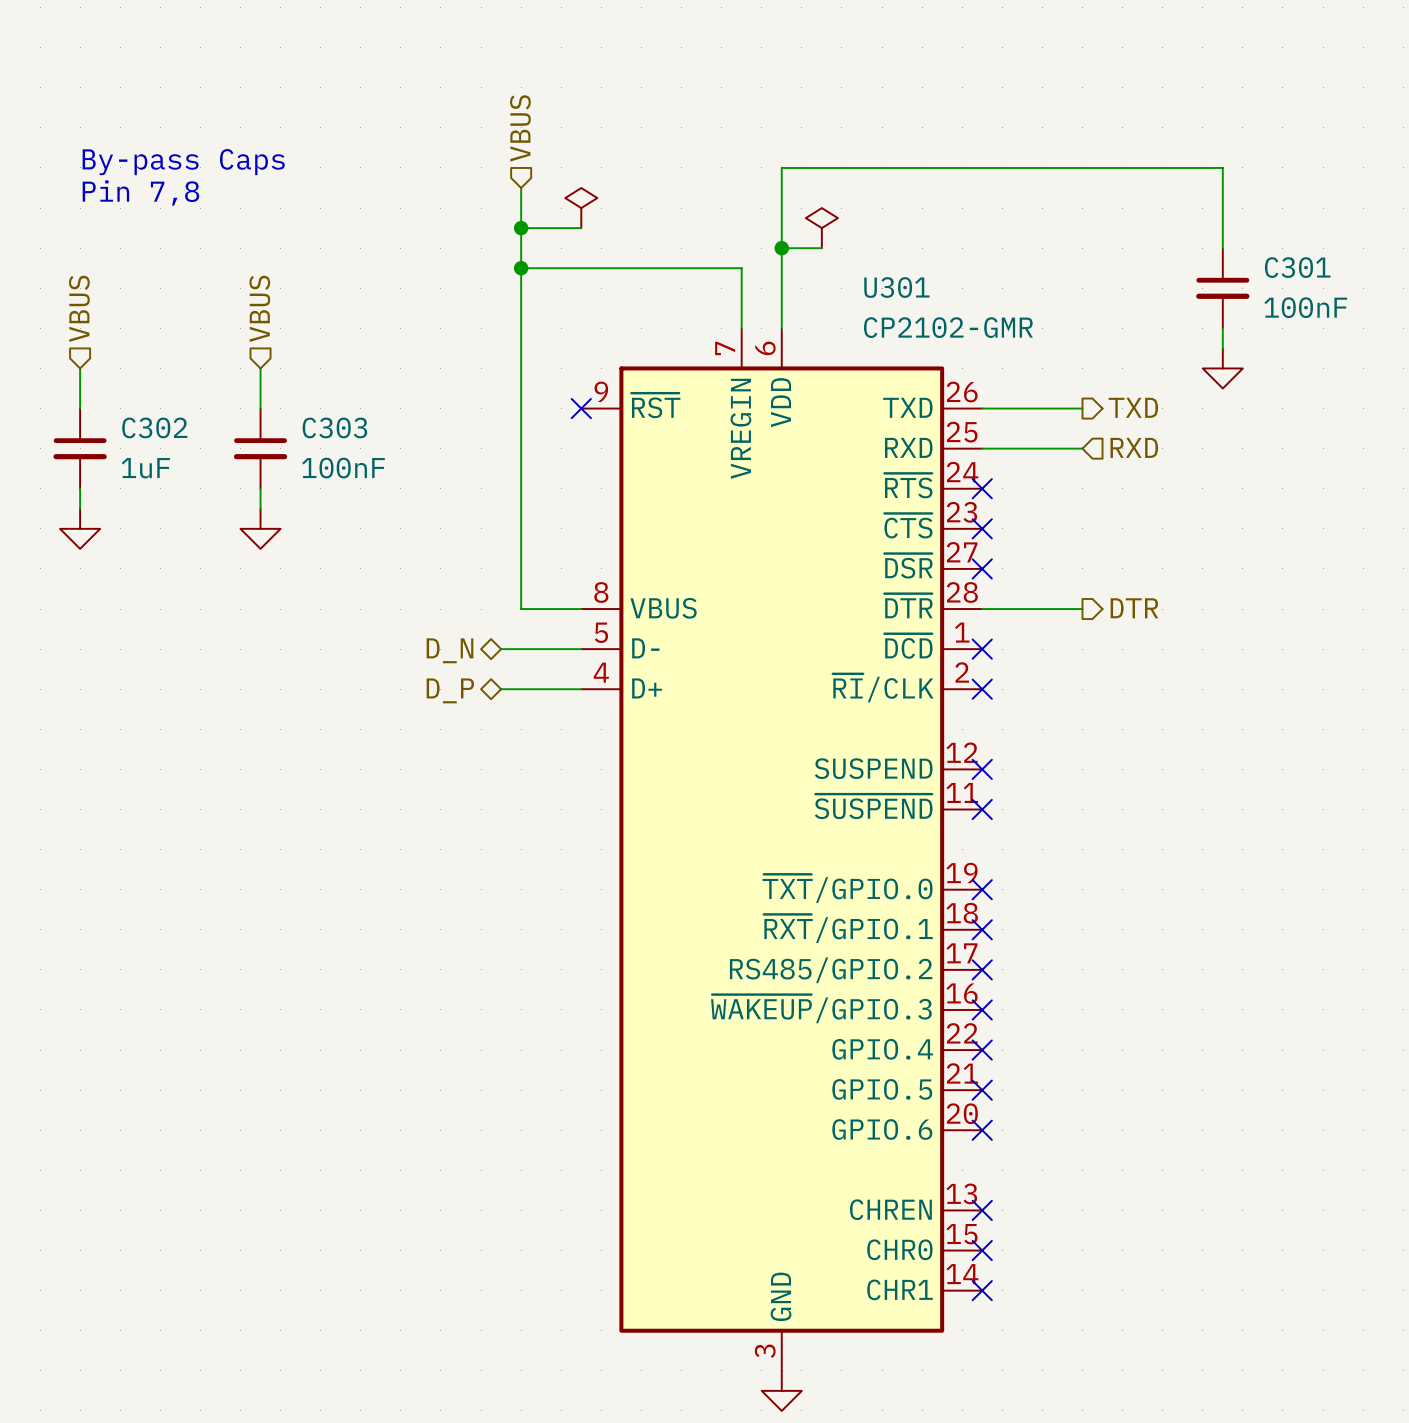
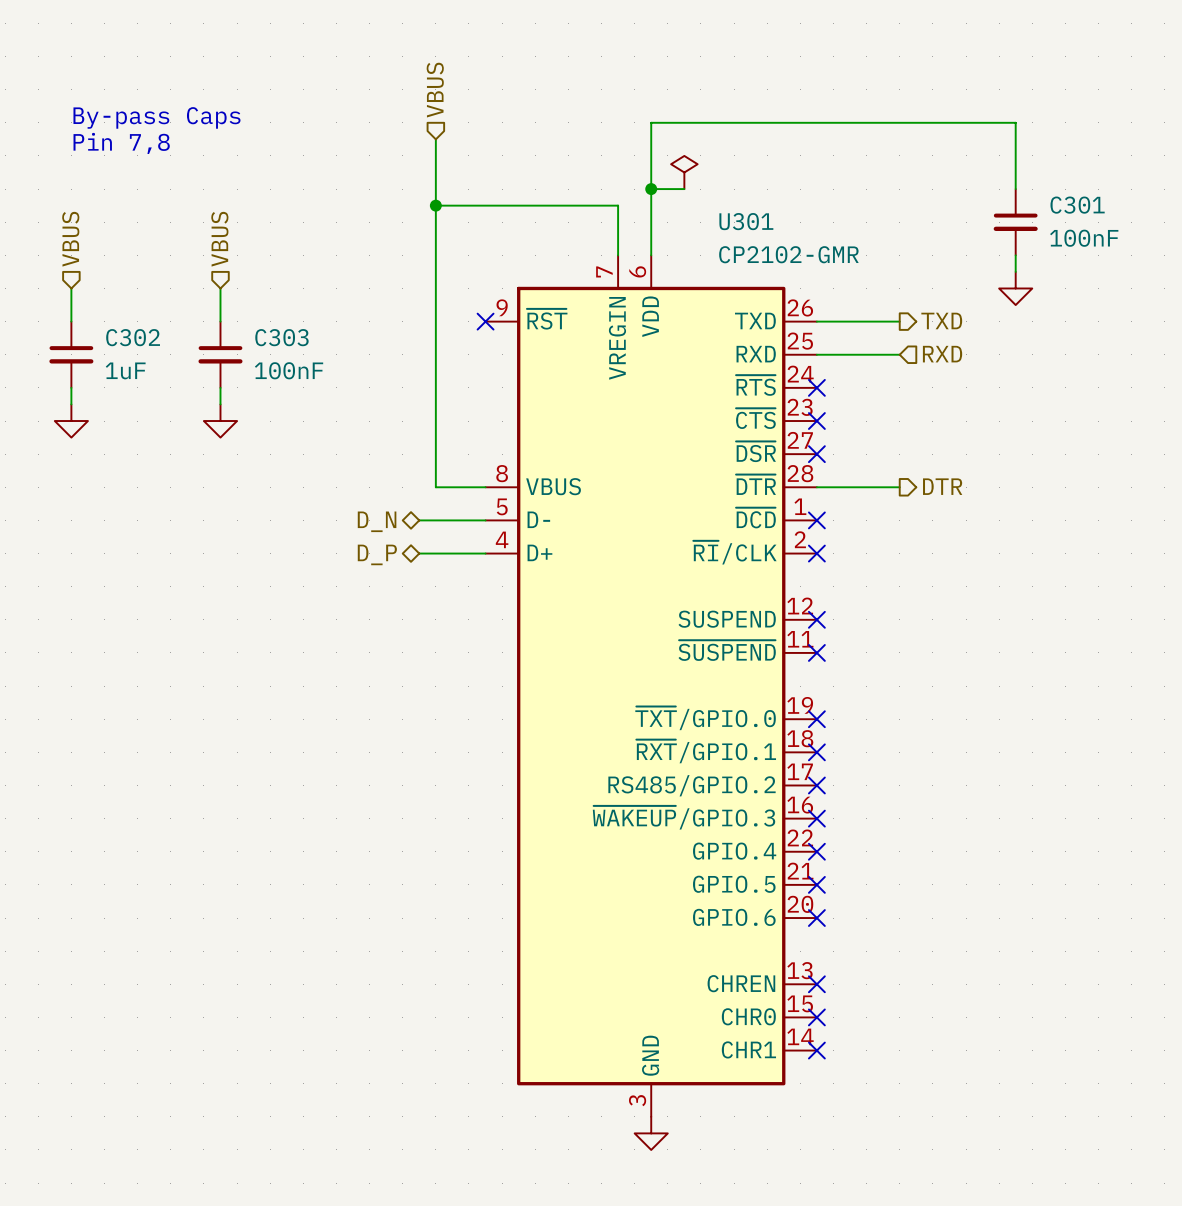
power symbol: (581, 208) -> none
wire: (521, 228) (581, 228) -> none
junction: (521, 228) -> none

